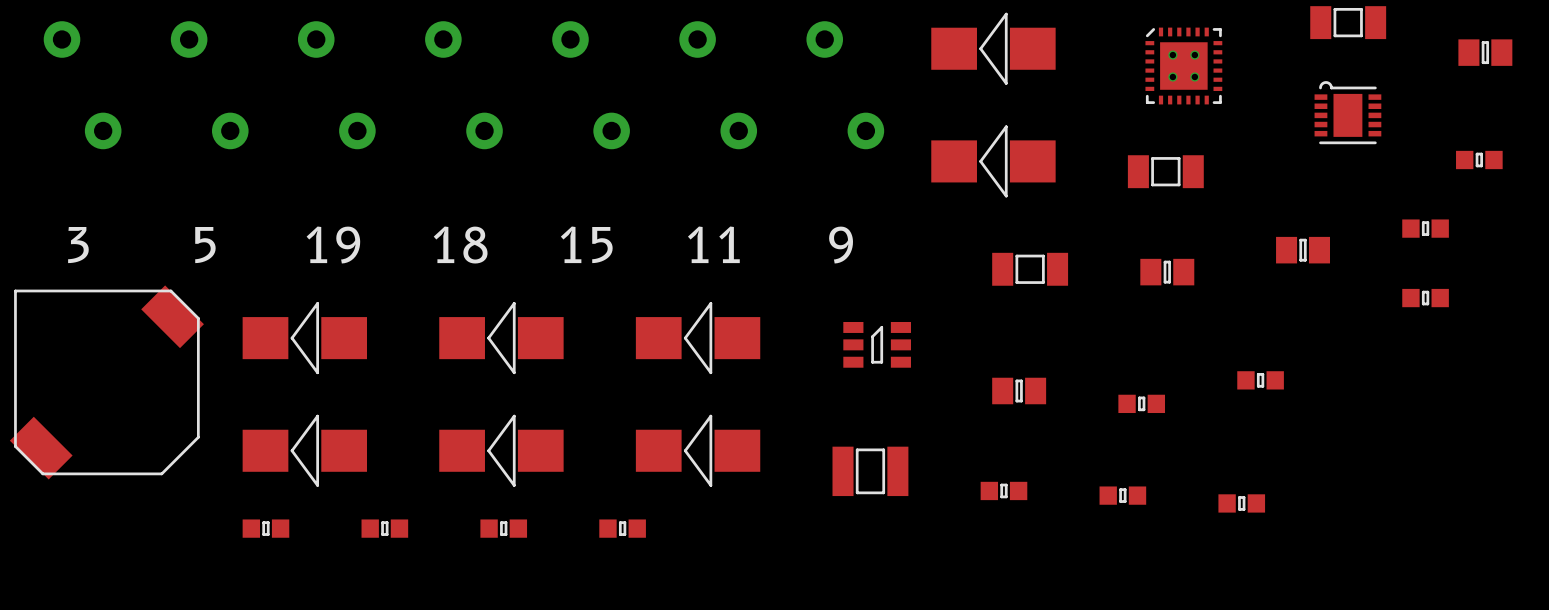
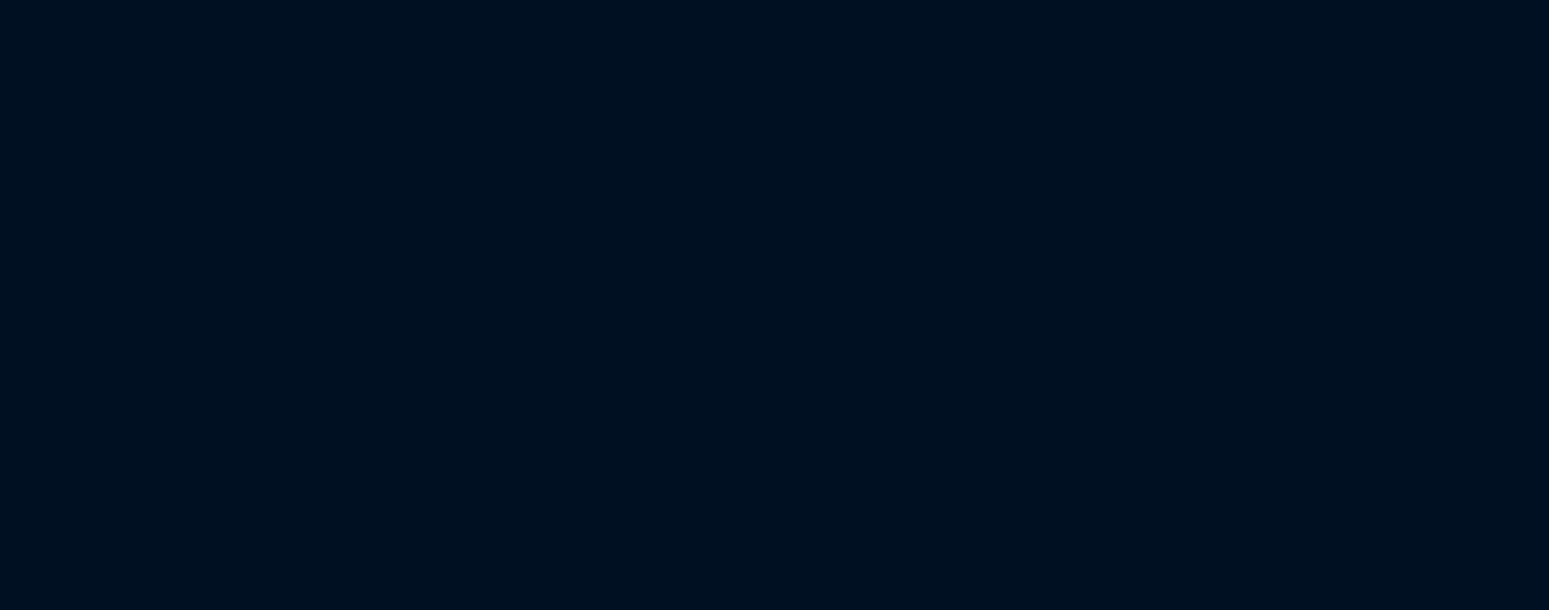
part: (1348, 22) -> none
part: (993, 48) -> none
part: (1485, 52) -> none
part: (1183, 66) -> none
part: 3 (82, 85) -> none
part: 5 (209, 85) -> none
part: 19 (336, 85) -> none
part: 18 (463, 85) -> none
part: 15 (591, 85) -> none
part: 11 (718, 85) -> none
part: 9 (845, 85) -> none
part: (1347, 112) -> none
part: (1479, 159) -> none
part: (993, 161) -> none
part: (1165, 171) -> none
part: (1425, 228) -> none
part: (1303, 250) -> none
part: (1030, 269) -> none
part: (1167, 272) -> none
part: (1425, 298) -> none
part: (304, 338) -> none
part: (501, 338) -> none
part: (698, 338) -> none
part: (877, 344) -> none
part: (1260, 380) -> none
part: (106, 382) -> none
part: (1019, 391) -> none
part: (1141, 403) -> none
part: (304, 450) -> none
part: (501, 450) -> none
part: (698, 450) -> none
part: (870, 471) -> none
part: (1003, 490) -> none
part: (1122, 495) -> none
part: (1241, 503) -> none
part: (265, 528) -> none
part: (384, 528) -> none
part: (503, 528) -> none
part: (622, 528) -> none

